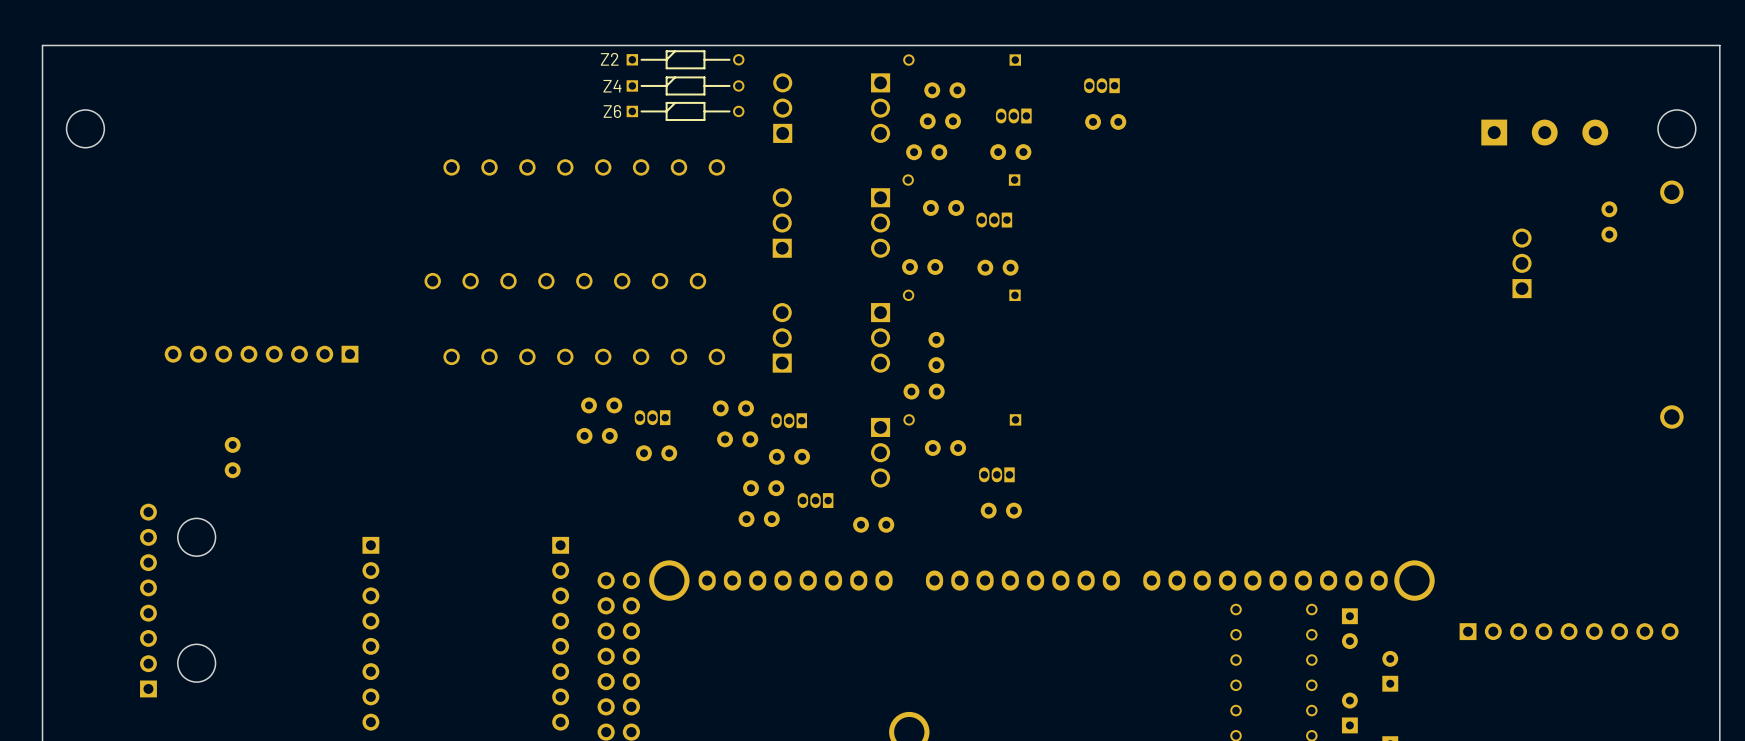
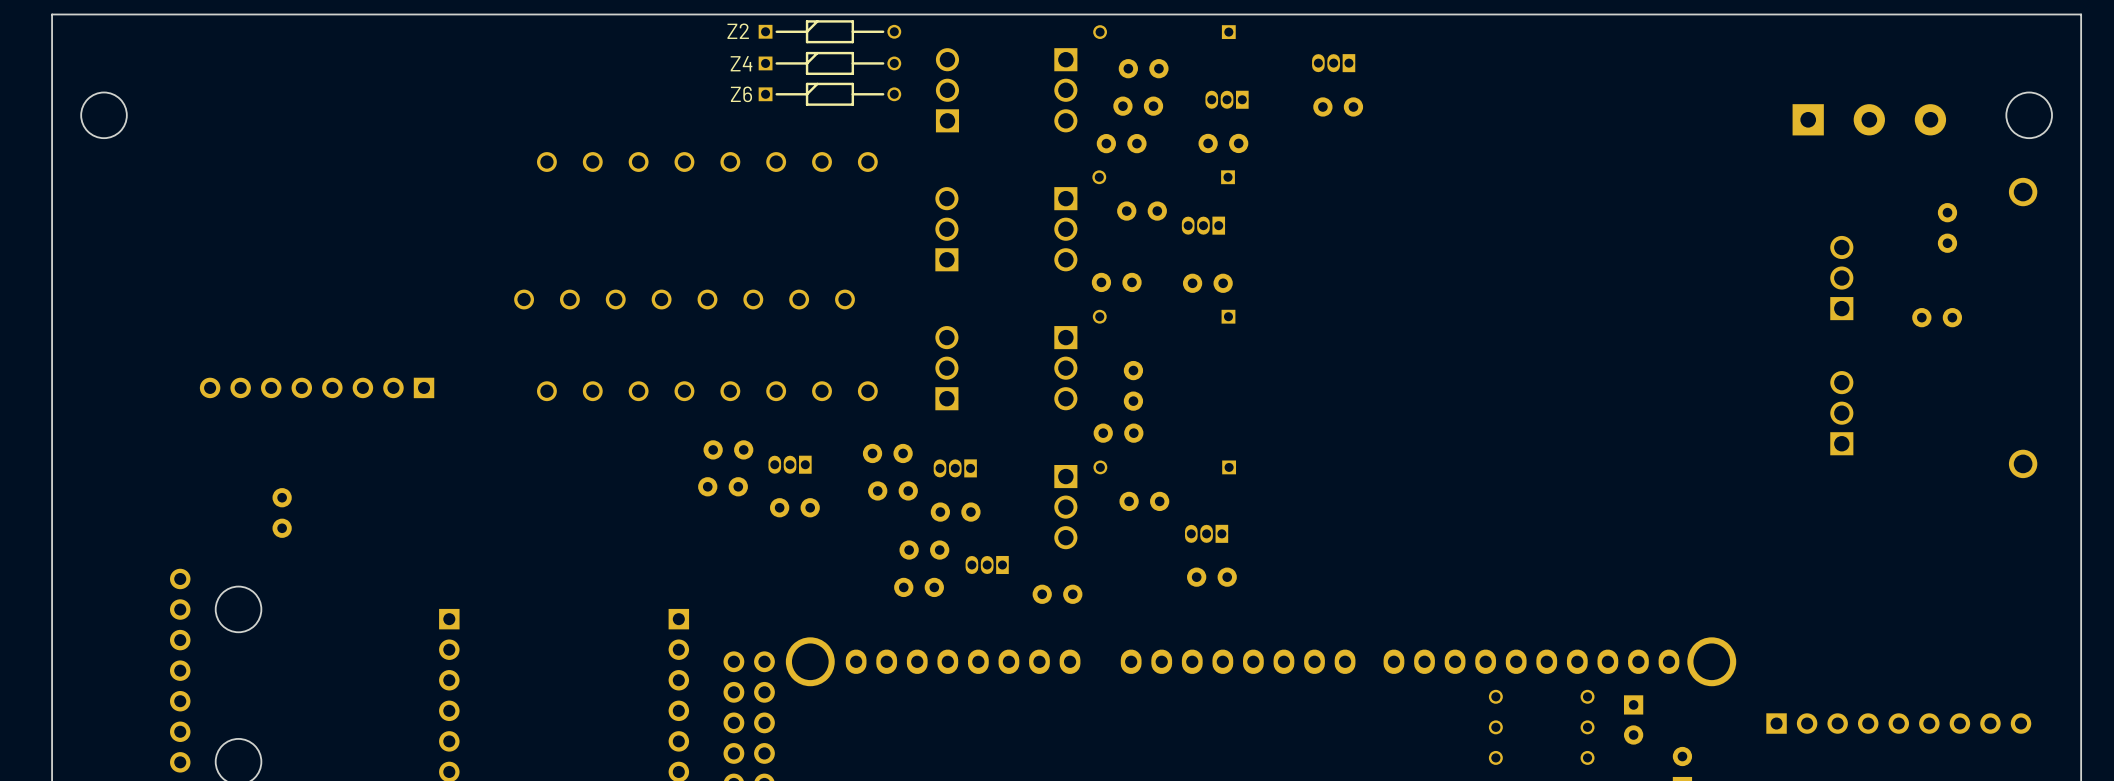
part: none -> (1937, 317)
part: none -> (1841, 413)

